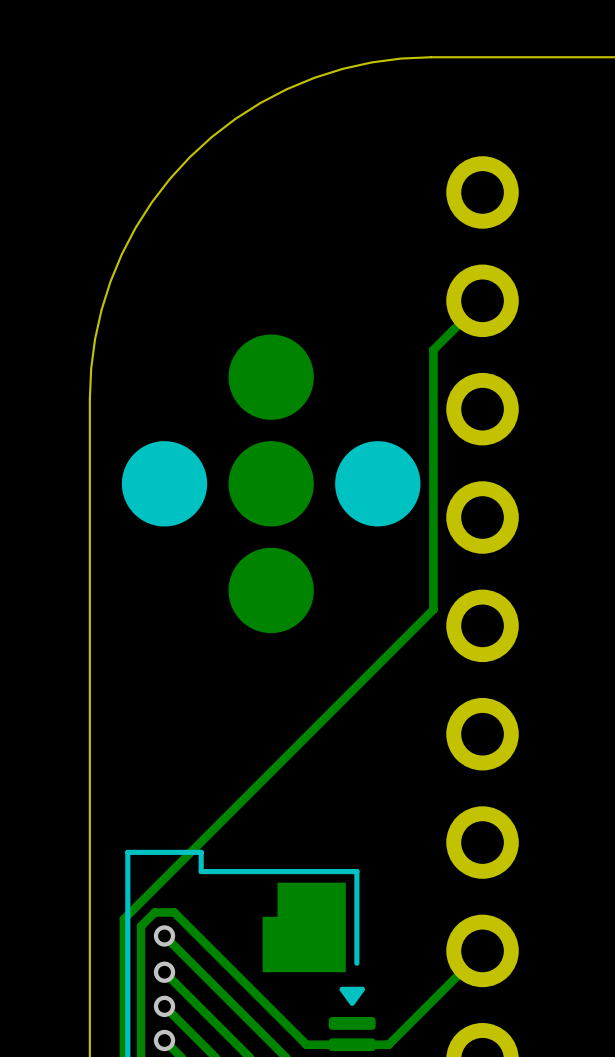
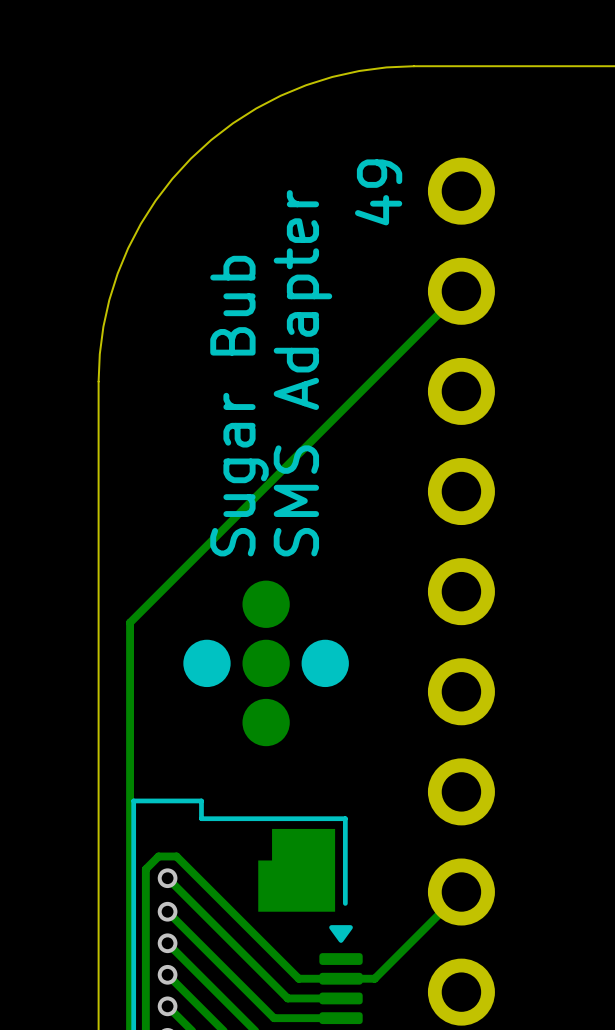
text: none -> 49 (378, 192)
track: (433, 349) (433, 609) (123, 919) -> (416, 336) (130, 622) (130, 862)
text: none -> SMS Adapter (302, 373)
text: none -> Sugar Bub (239, 406)
part: (271, 483) -> none
part: none -> (266, 663)

